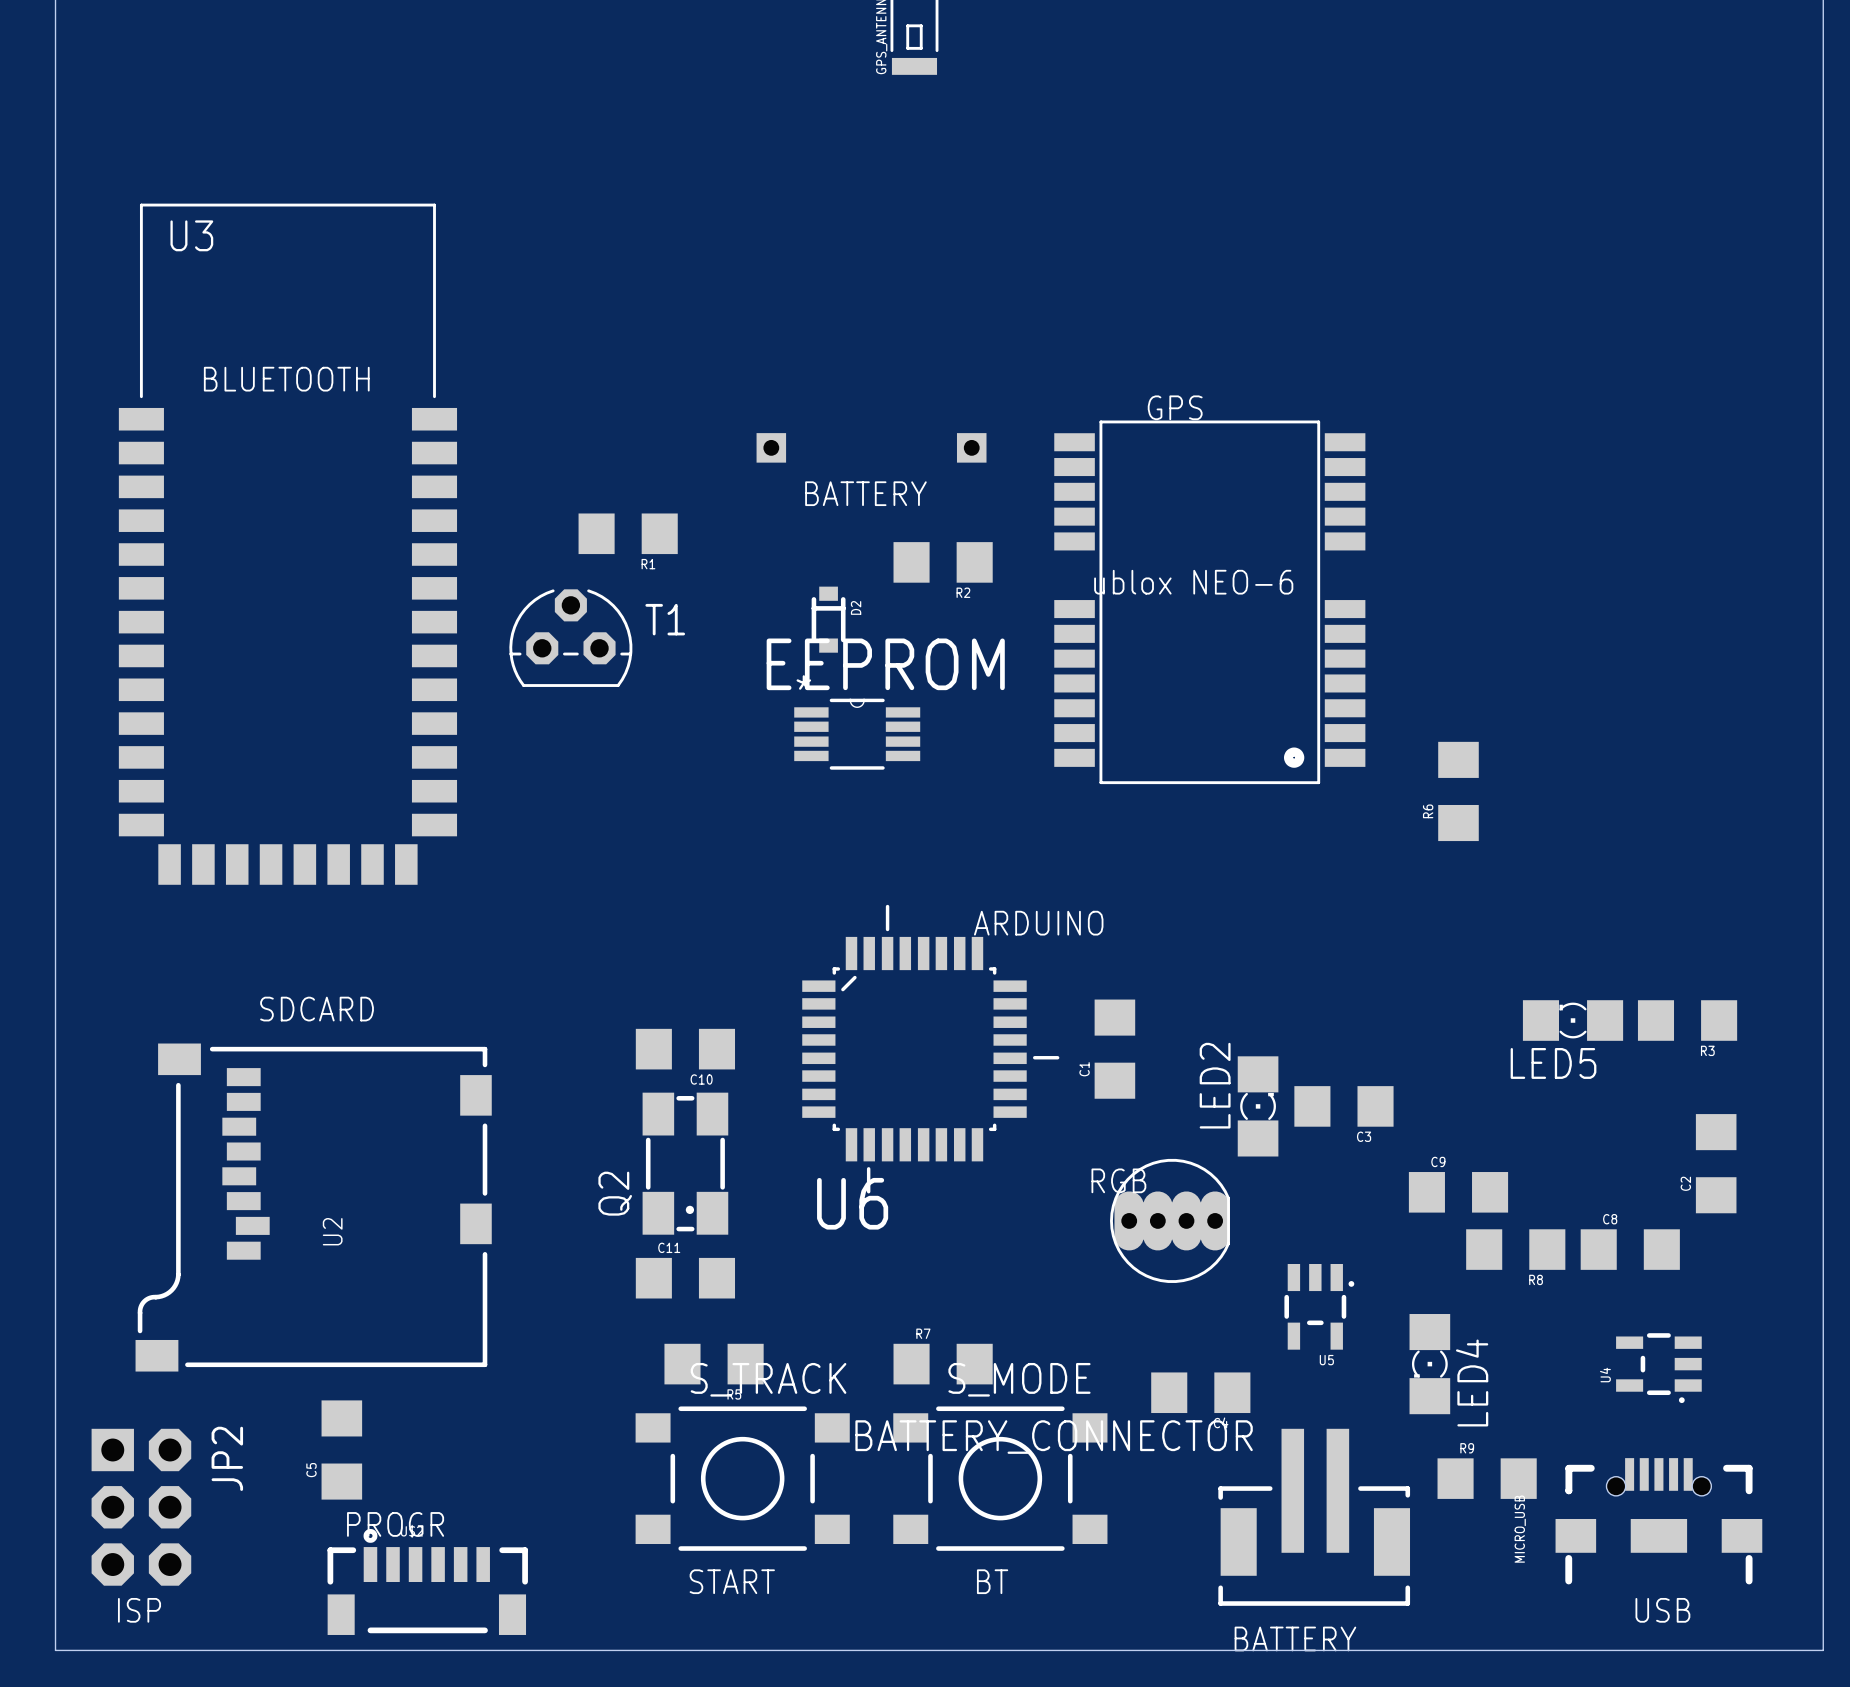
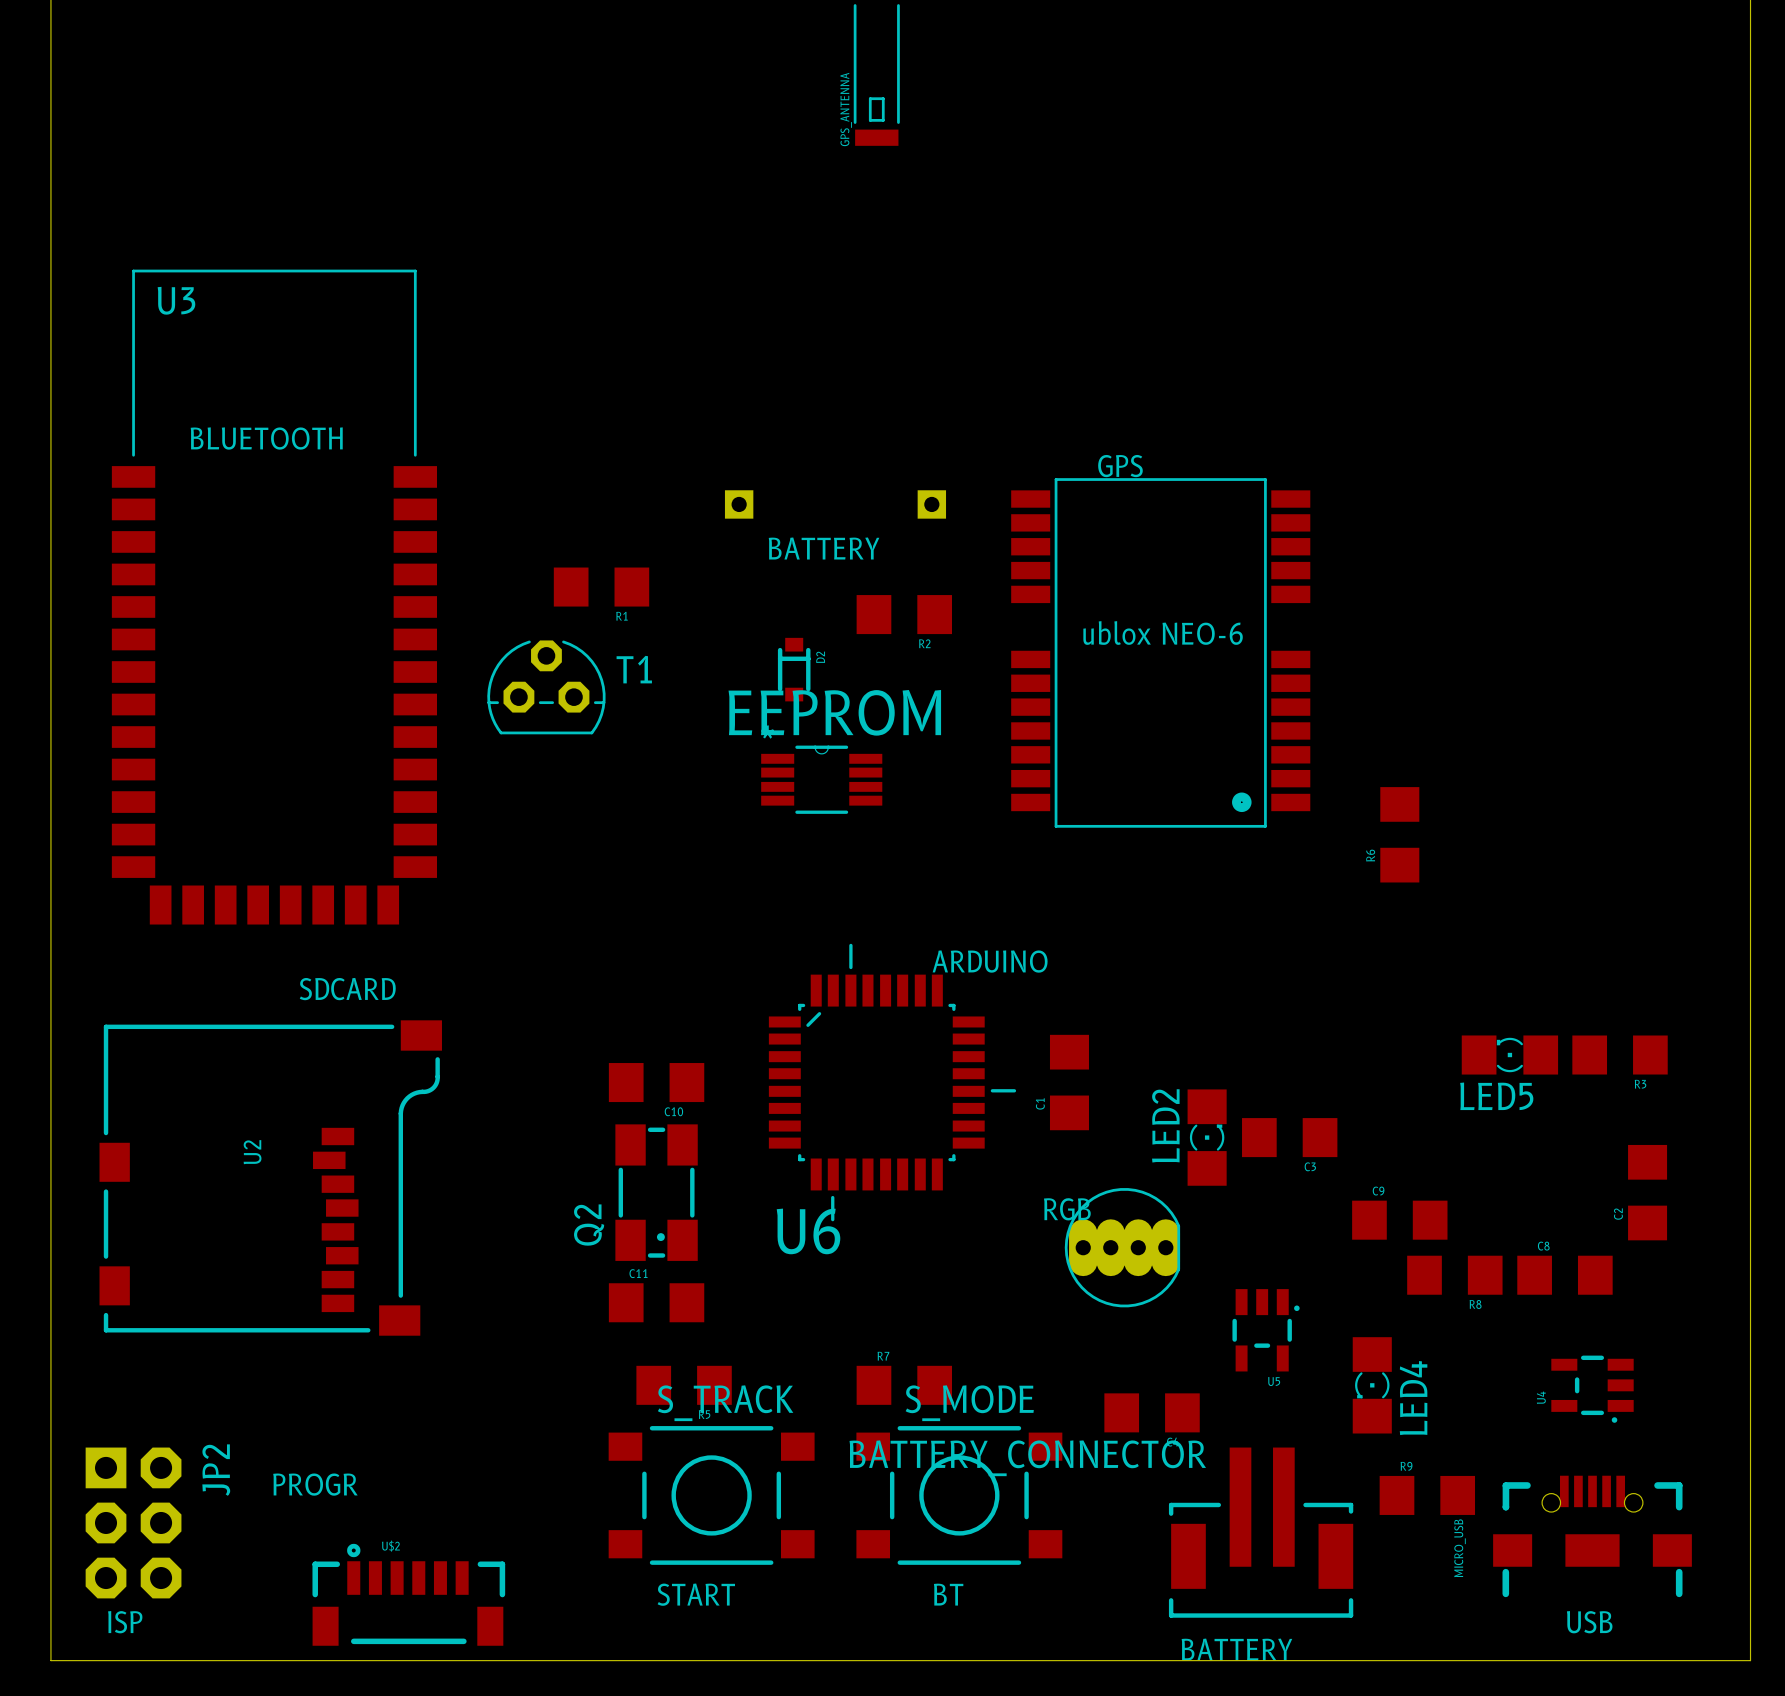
text position: SDCARD (317, 1009) -> SDCARD (347, 989)
U2 rotation: 0° (313, 1207) -> 180° (270, 1178)
C5: (341, 1450) -> none
text position: PROGR (395, 1524) -> PROGR (315, 1484)

